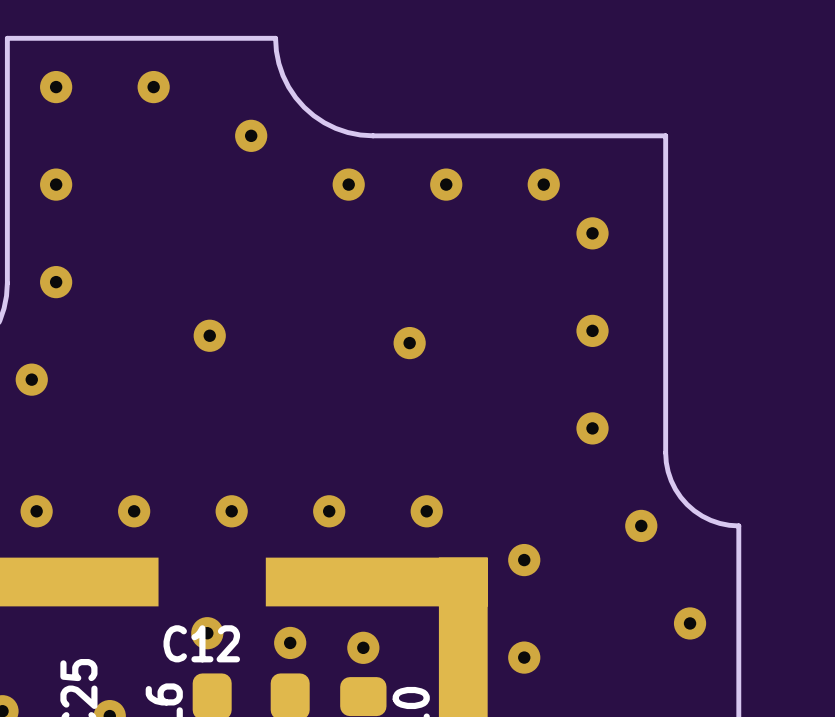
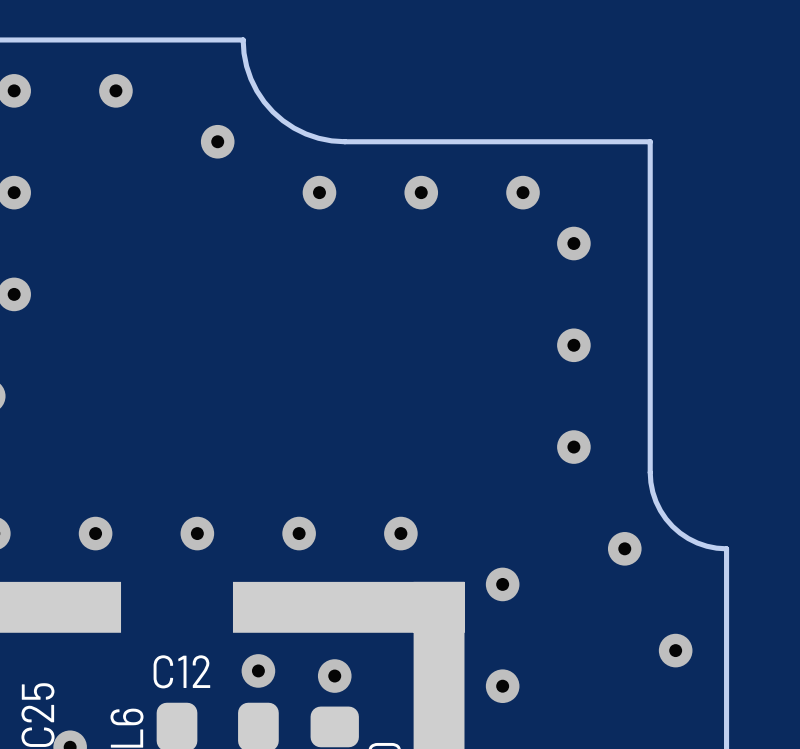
via: (209, 335) -> none
via: (409, 343) -> none
via: (207, 633) -> none

